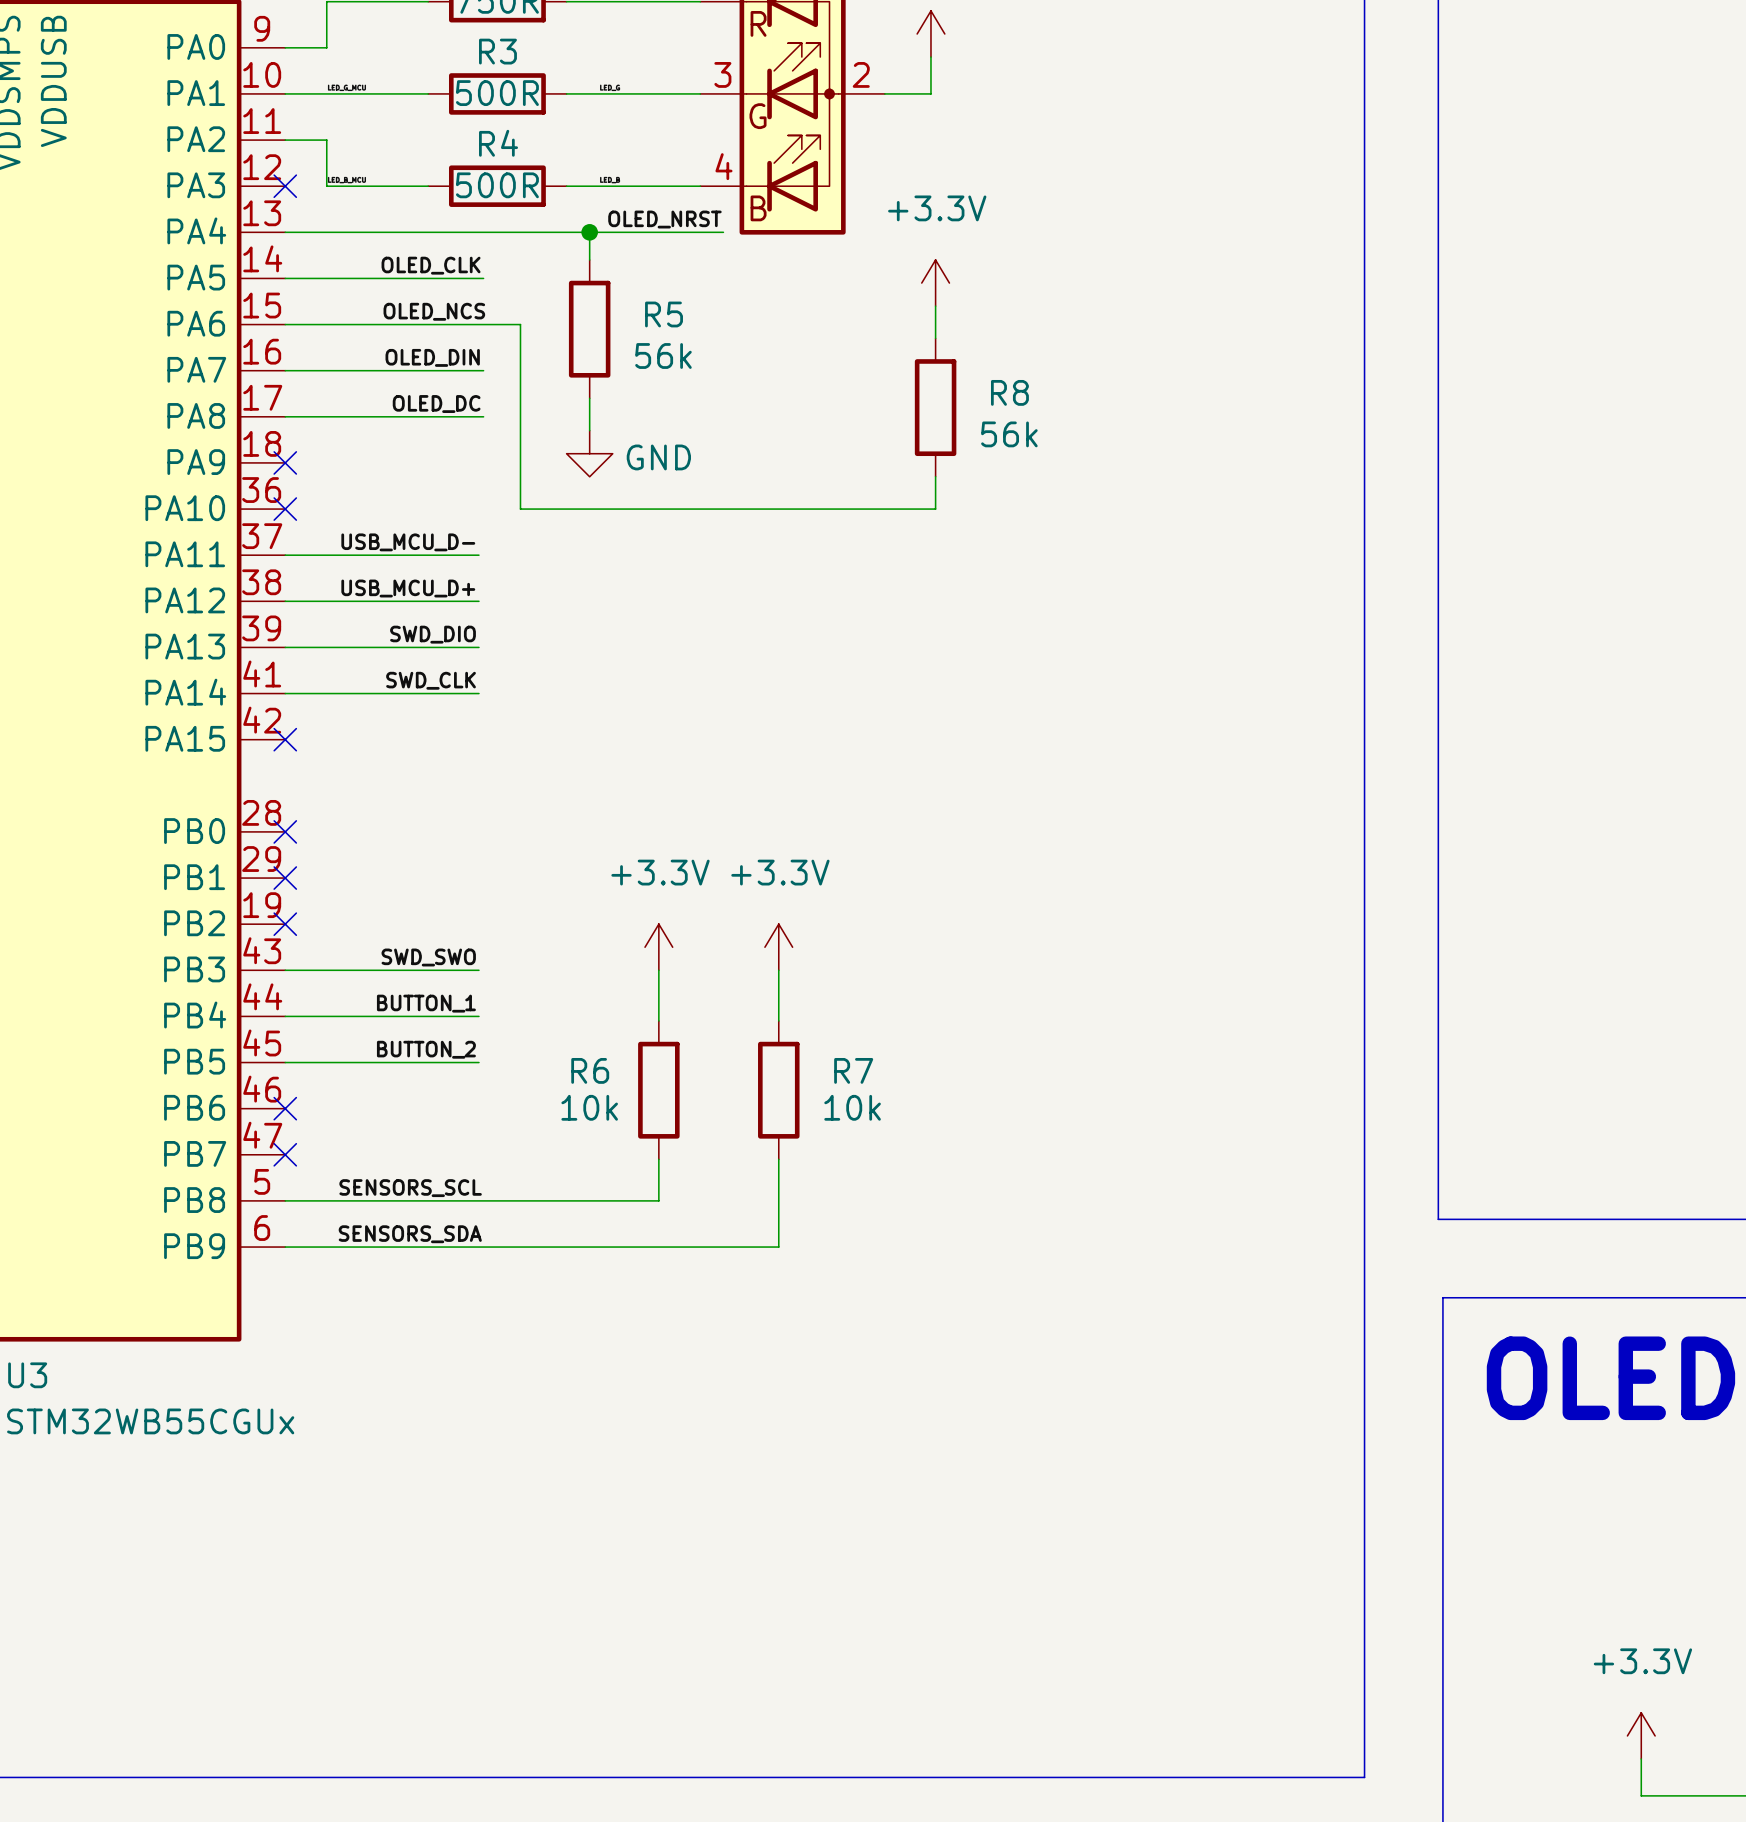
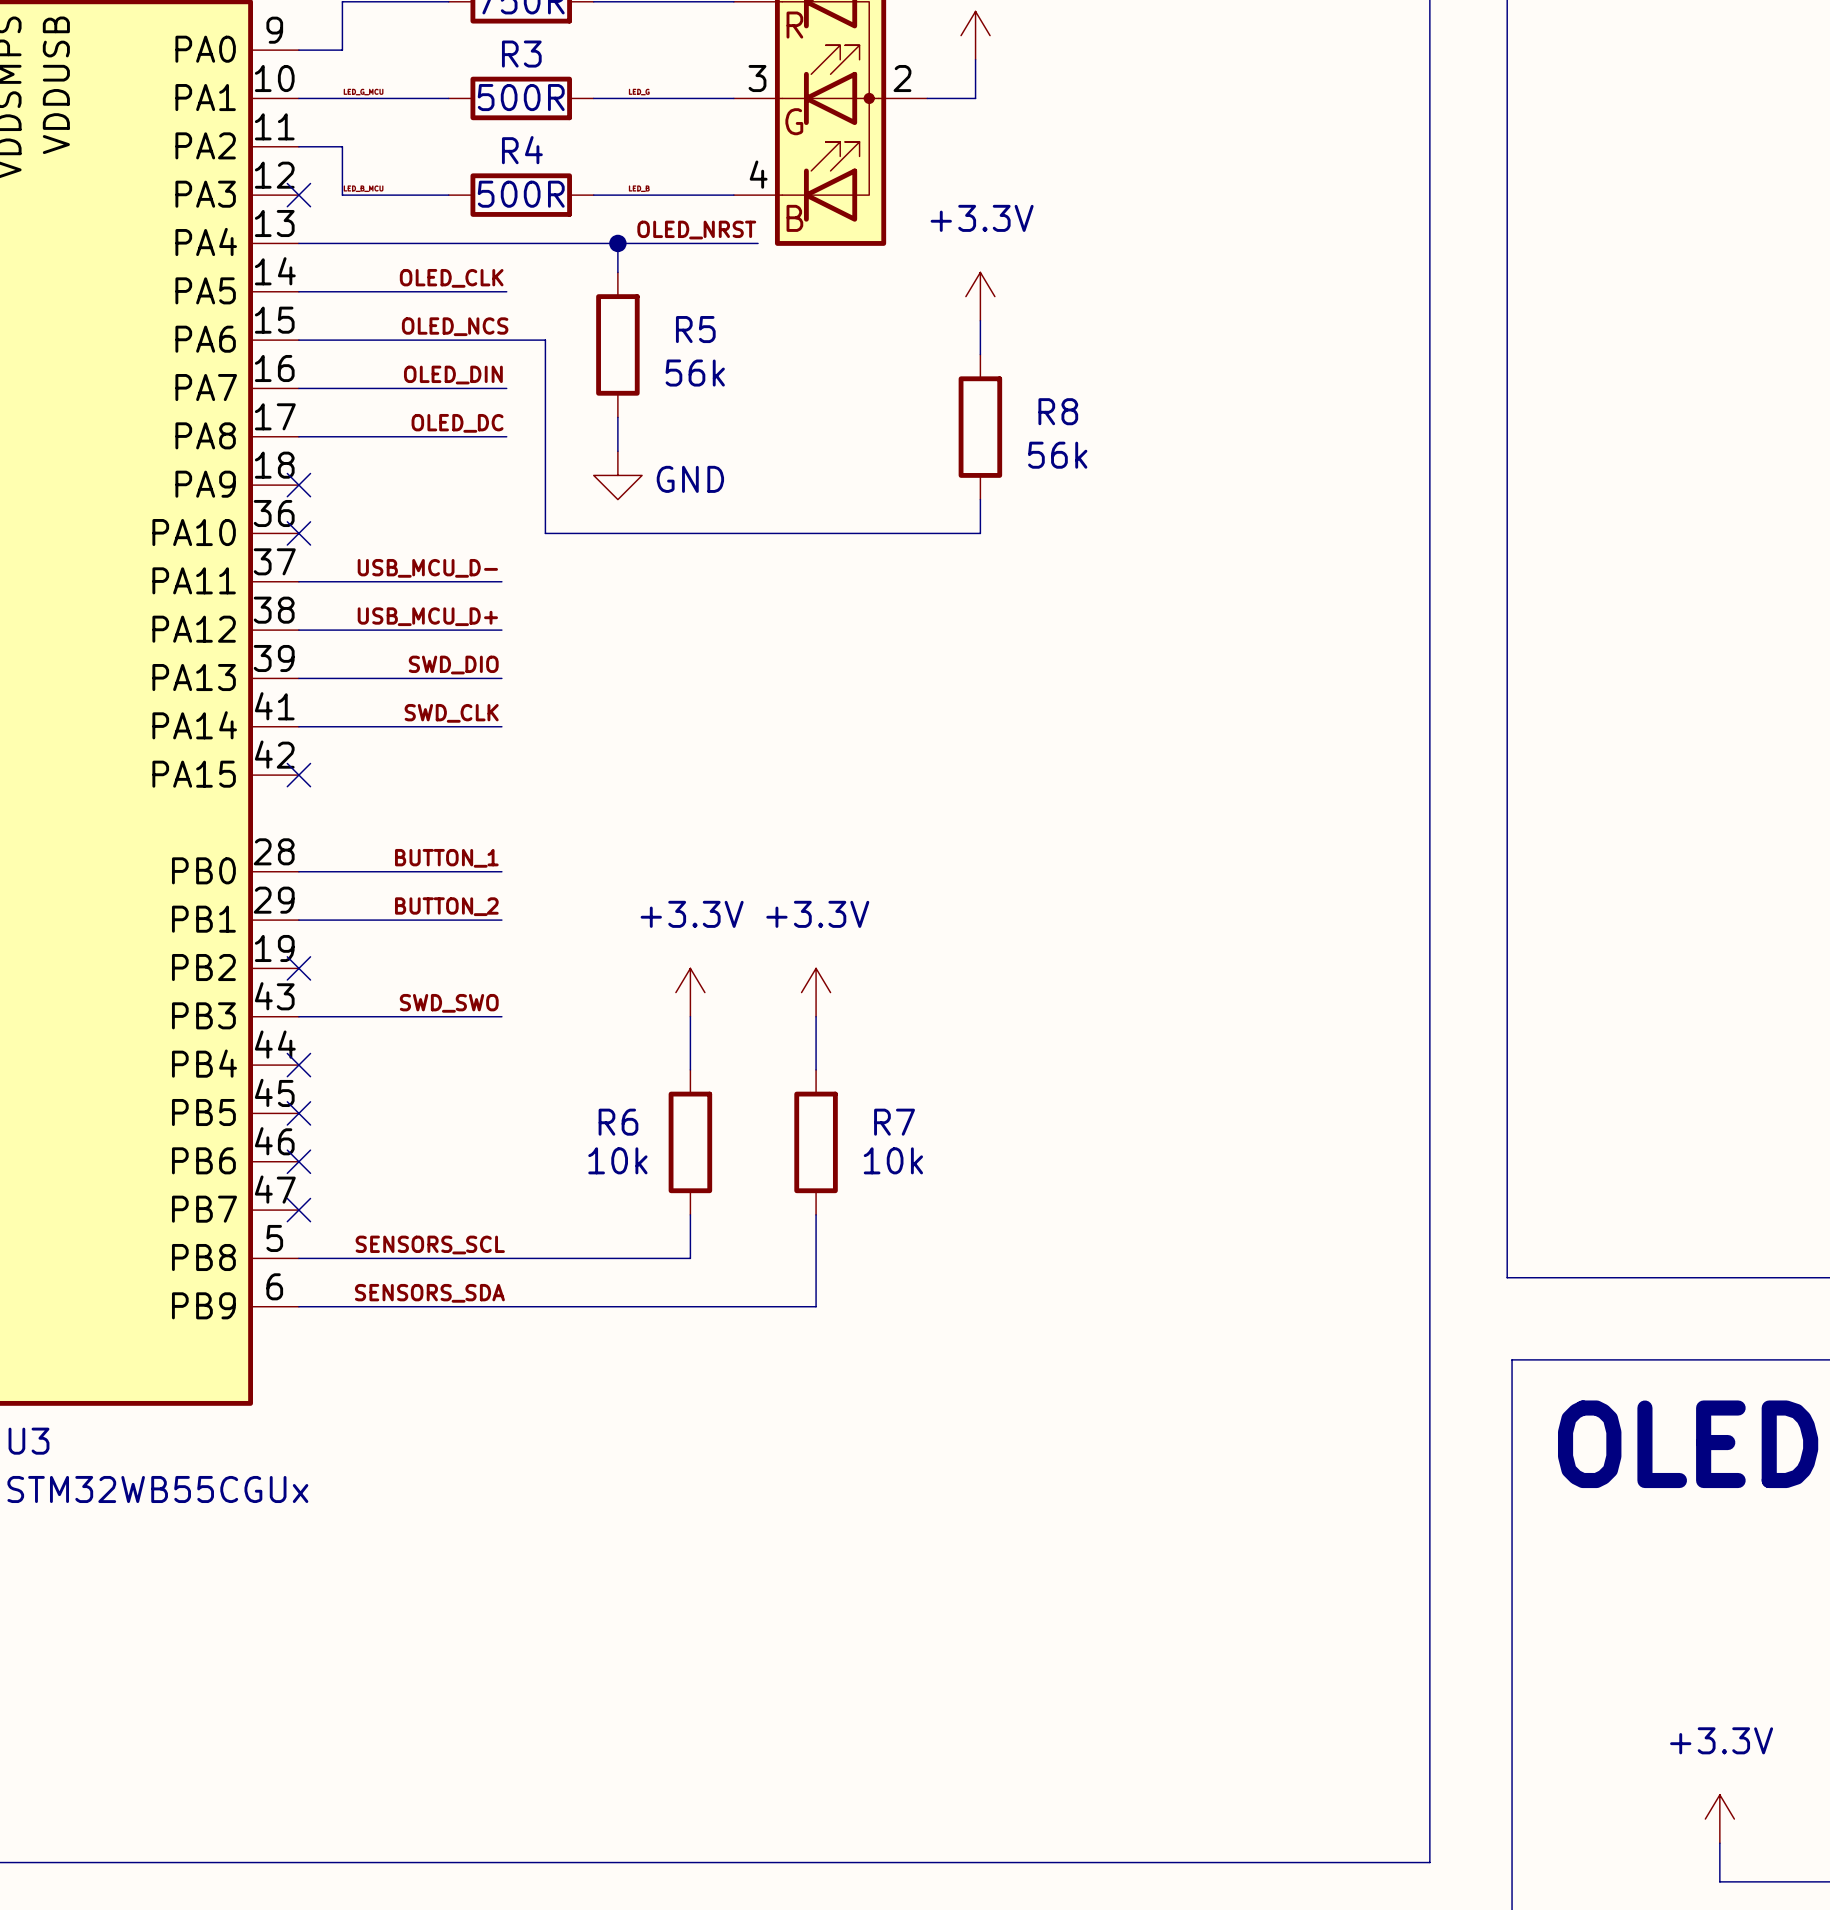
no-connect mark: (285, 831) -> none
no-connect mark: (285, 878) -> none
label position: BUTTON_1 (426, 1003) -> BUTTON_1 (446, 858)
wire: (285, 1016) (478, 1016) -> (298, 920) (501, 920)
no-connect mark: none -> (298, 1065)
label position: BUTTON_2 (426, 1049) -> BUTTON_2 (446, 906)
wire: (285, 1062) (478, 1062) -> (298, 871) (501, 871)
no-connect mark: none -> (298, 1113)

